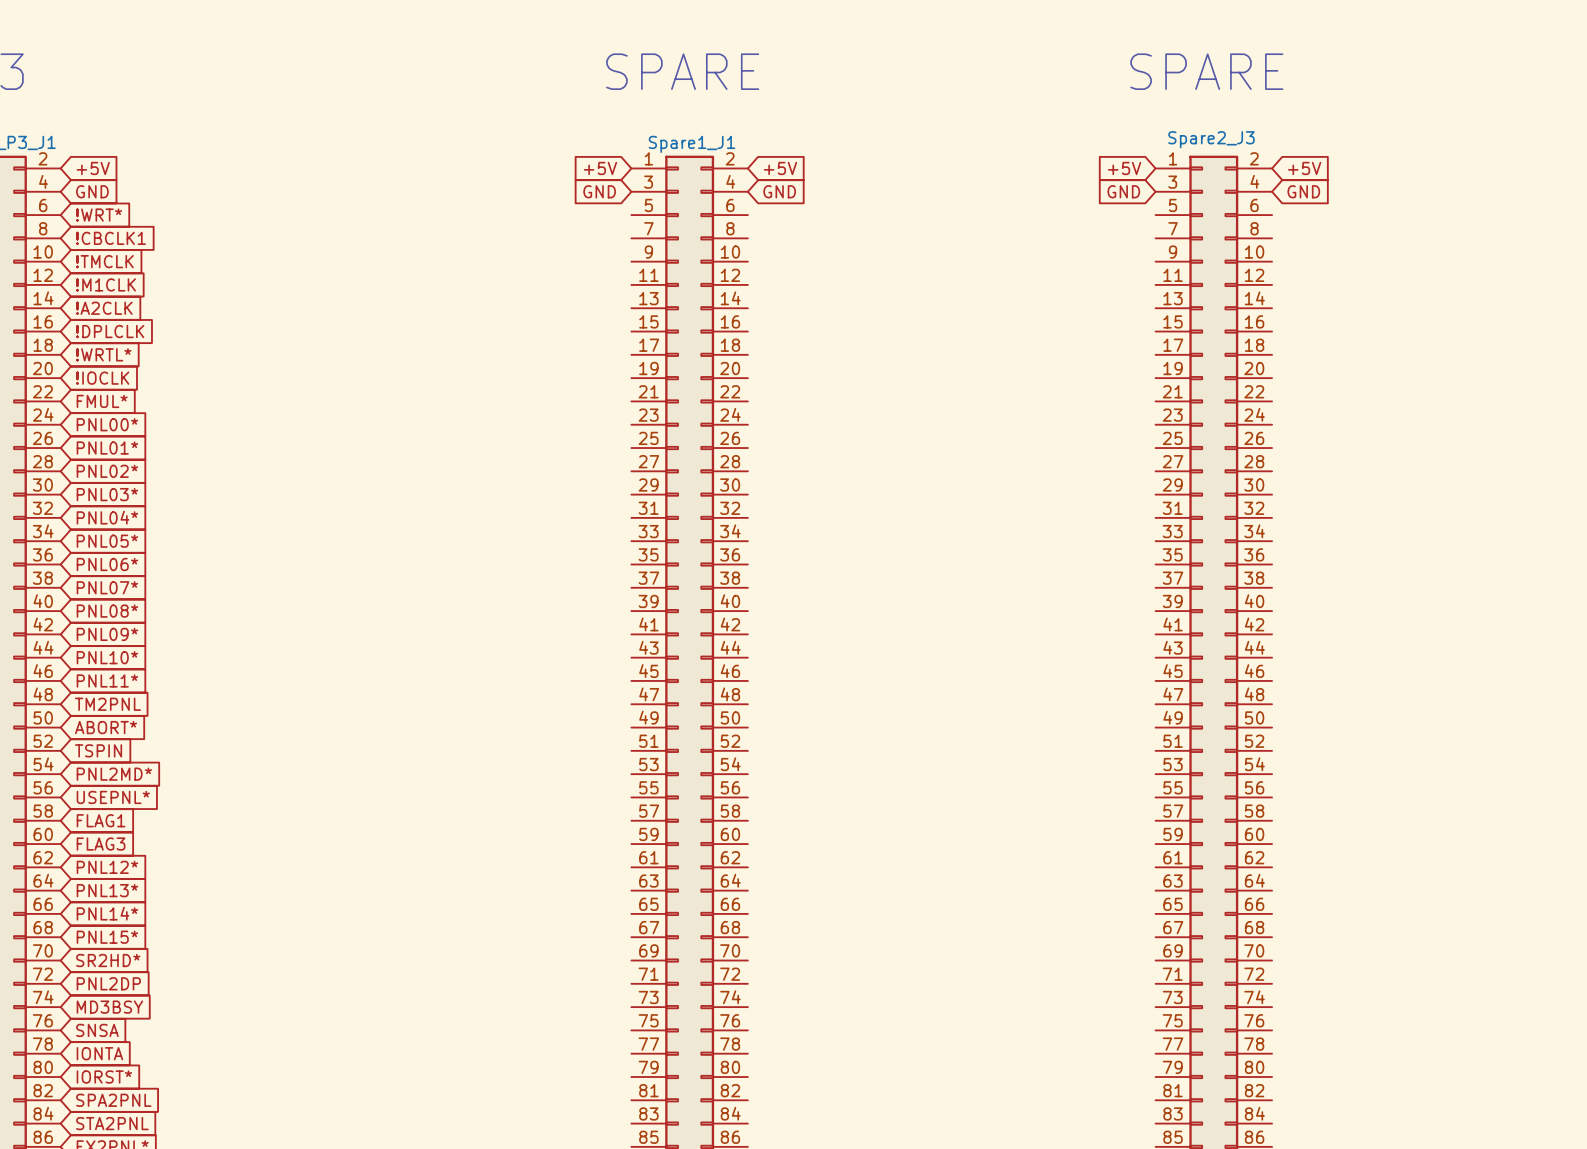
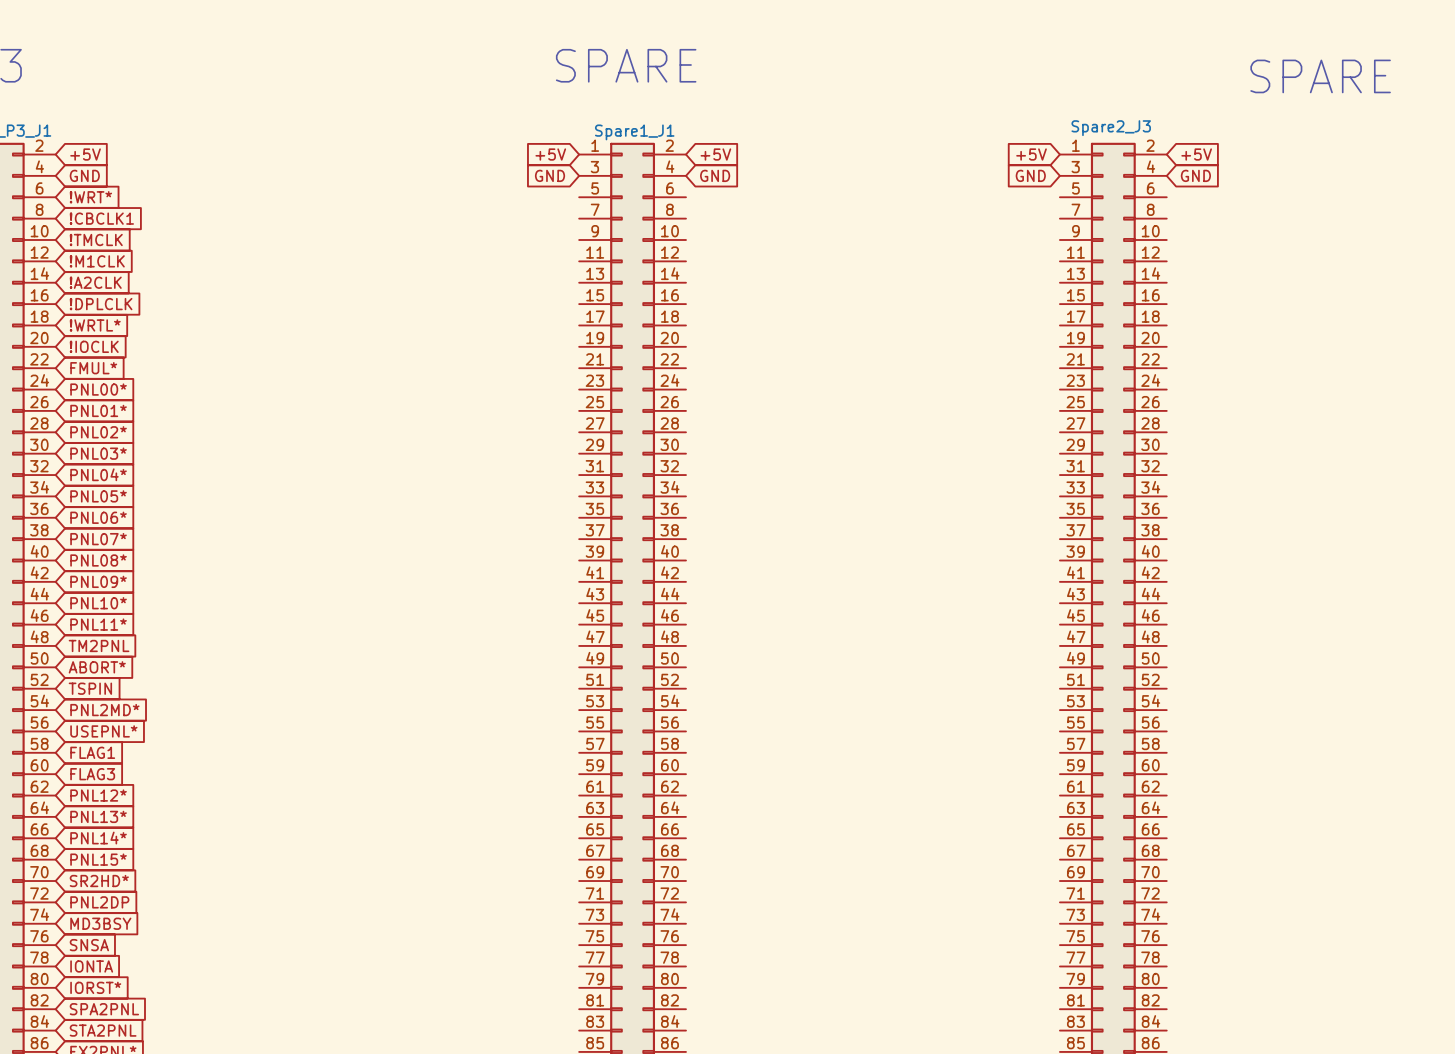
text: SPARE (1206, 71) -> none
text: none -> SPARE (1320, 76)

